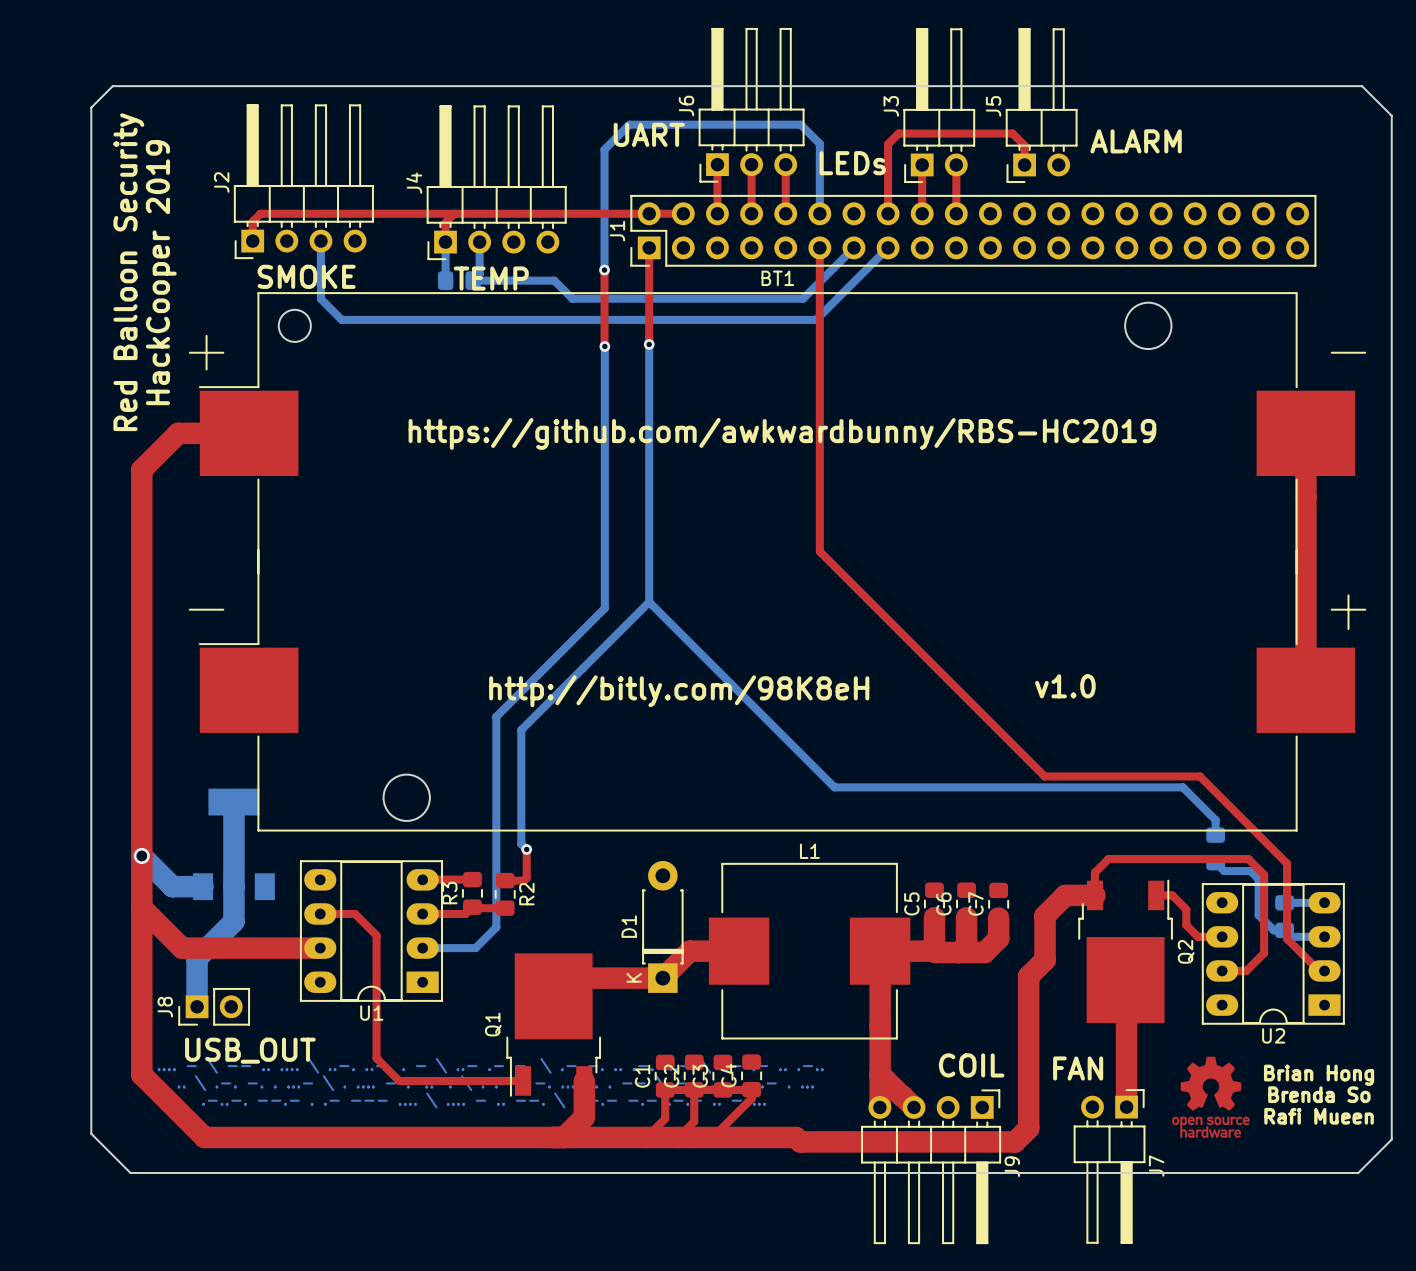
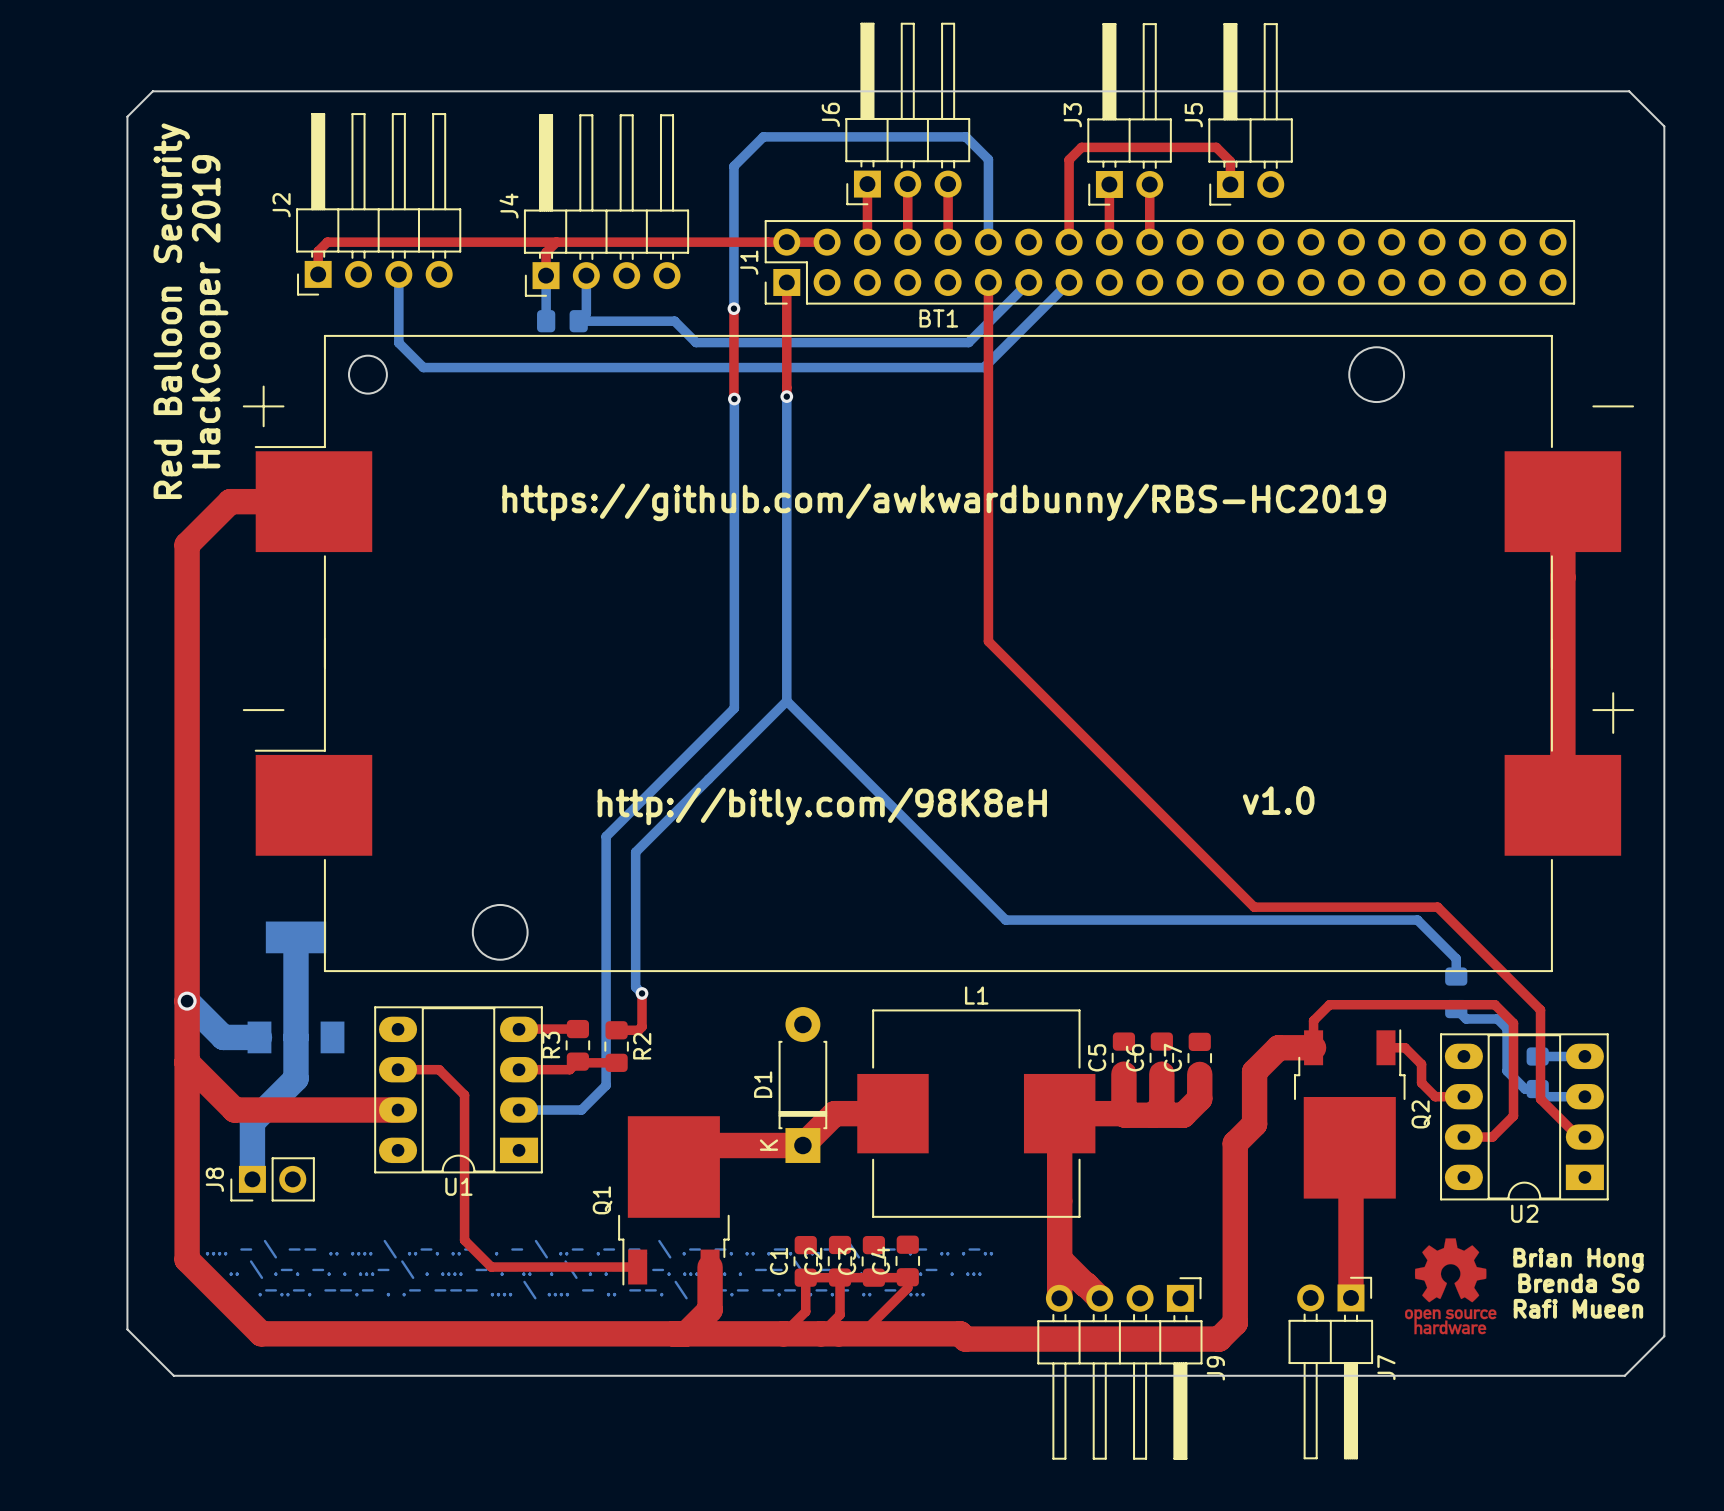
text: UART (649, 134) -> none
text: ALARM (1136, 141) -> none
text: LEDs (852, 163) -> none
text: SMOKE (306, 276) -> none
text: TEMP (491, 278) -> none
text: USB_OUT (250, 1050) -> none
text: COIL (971, 1065) -> none
text: FAN (1078, 1068) -> none

